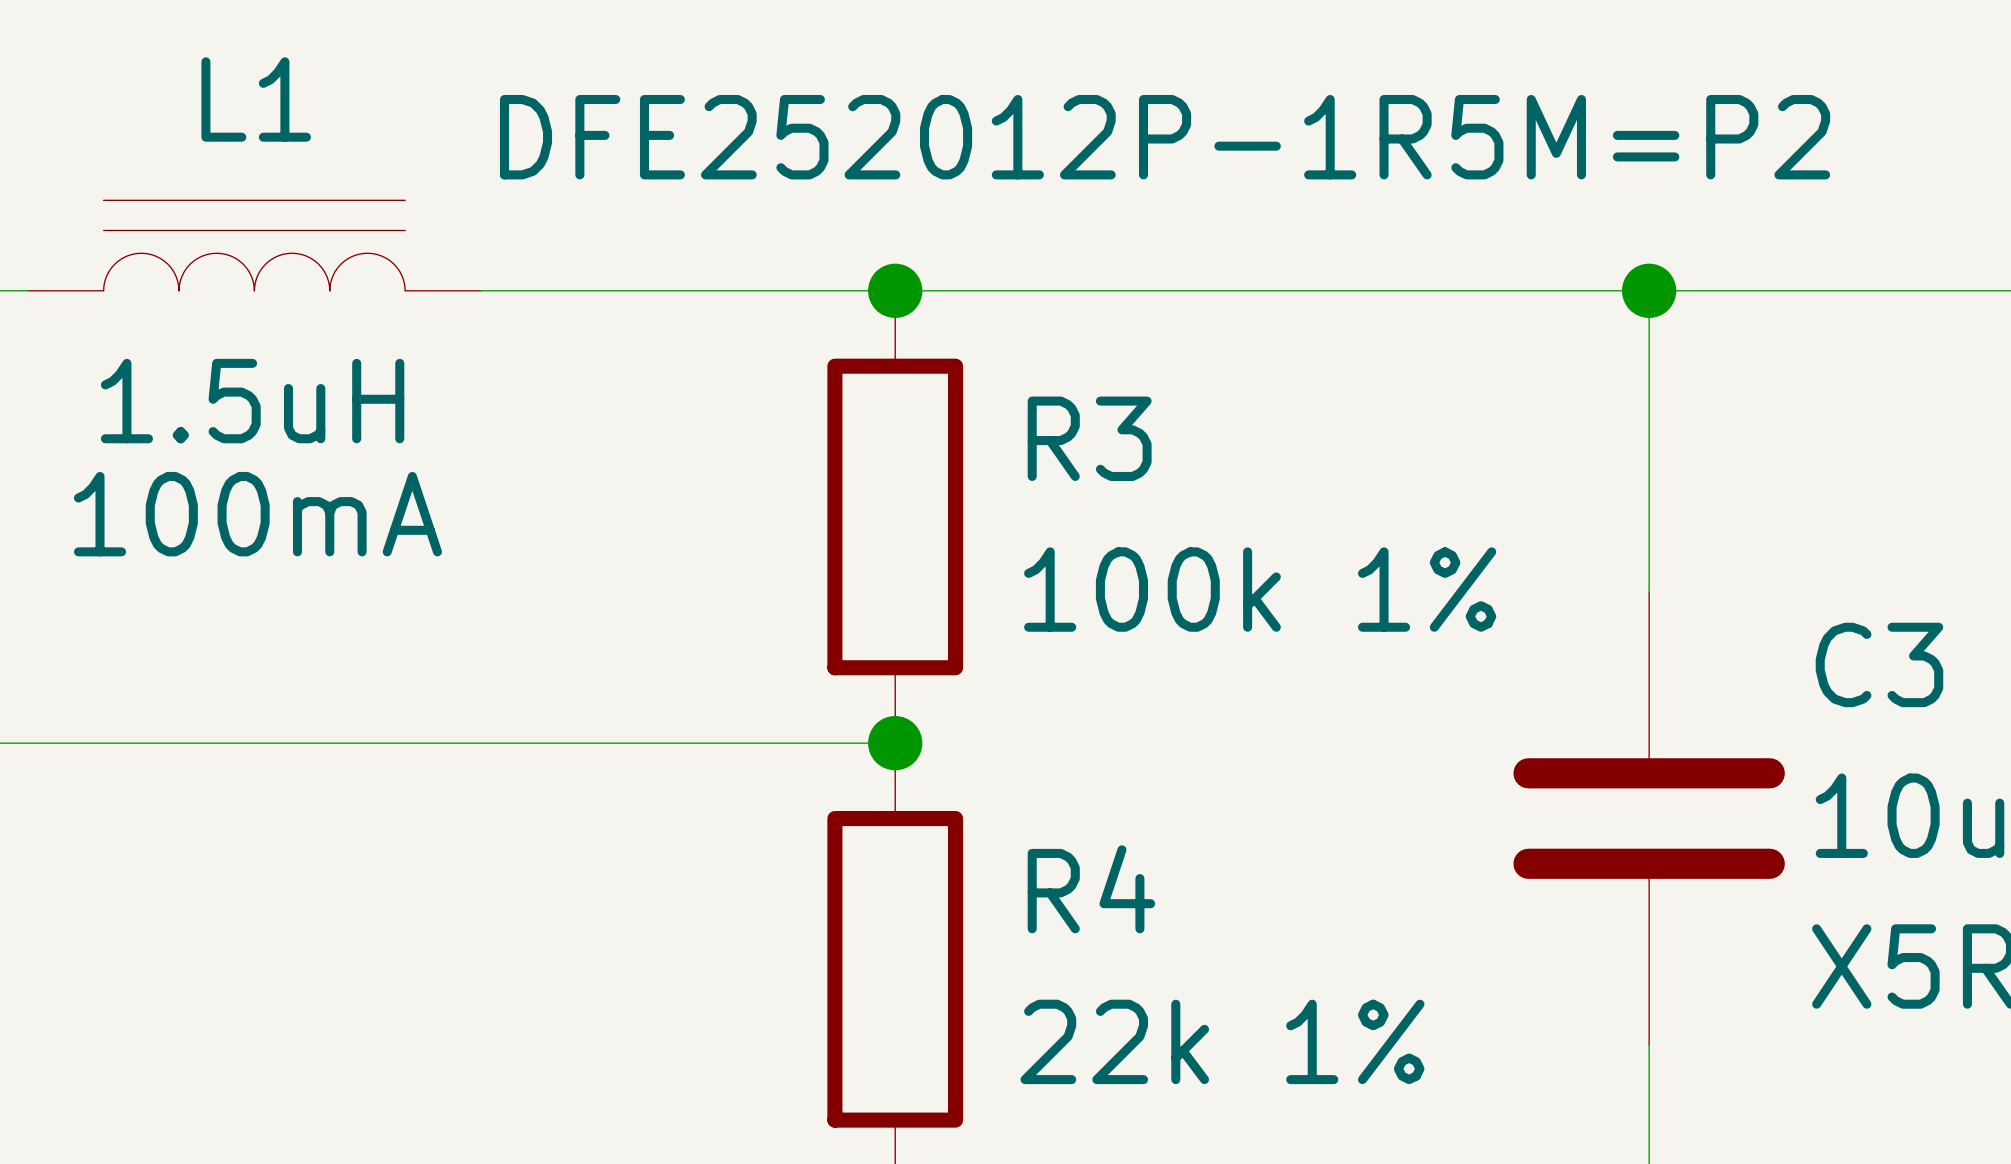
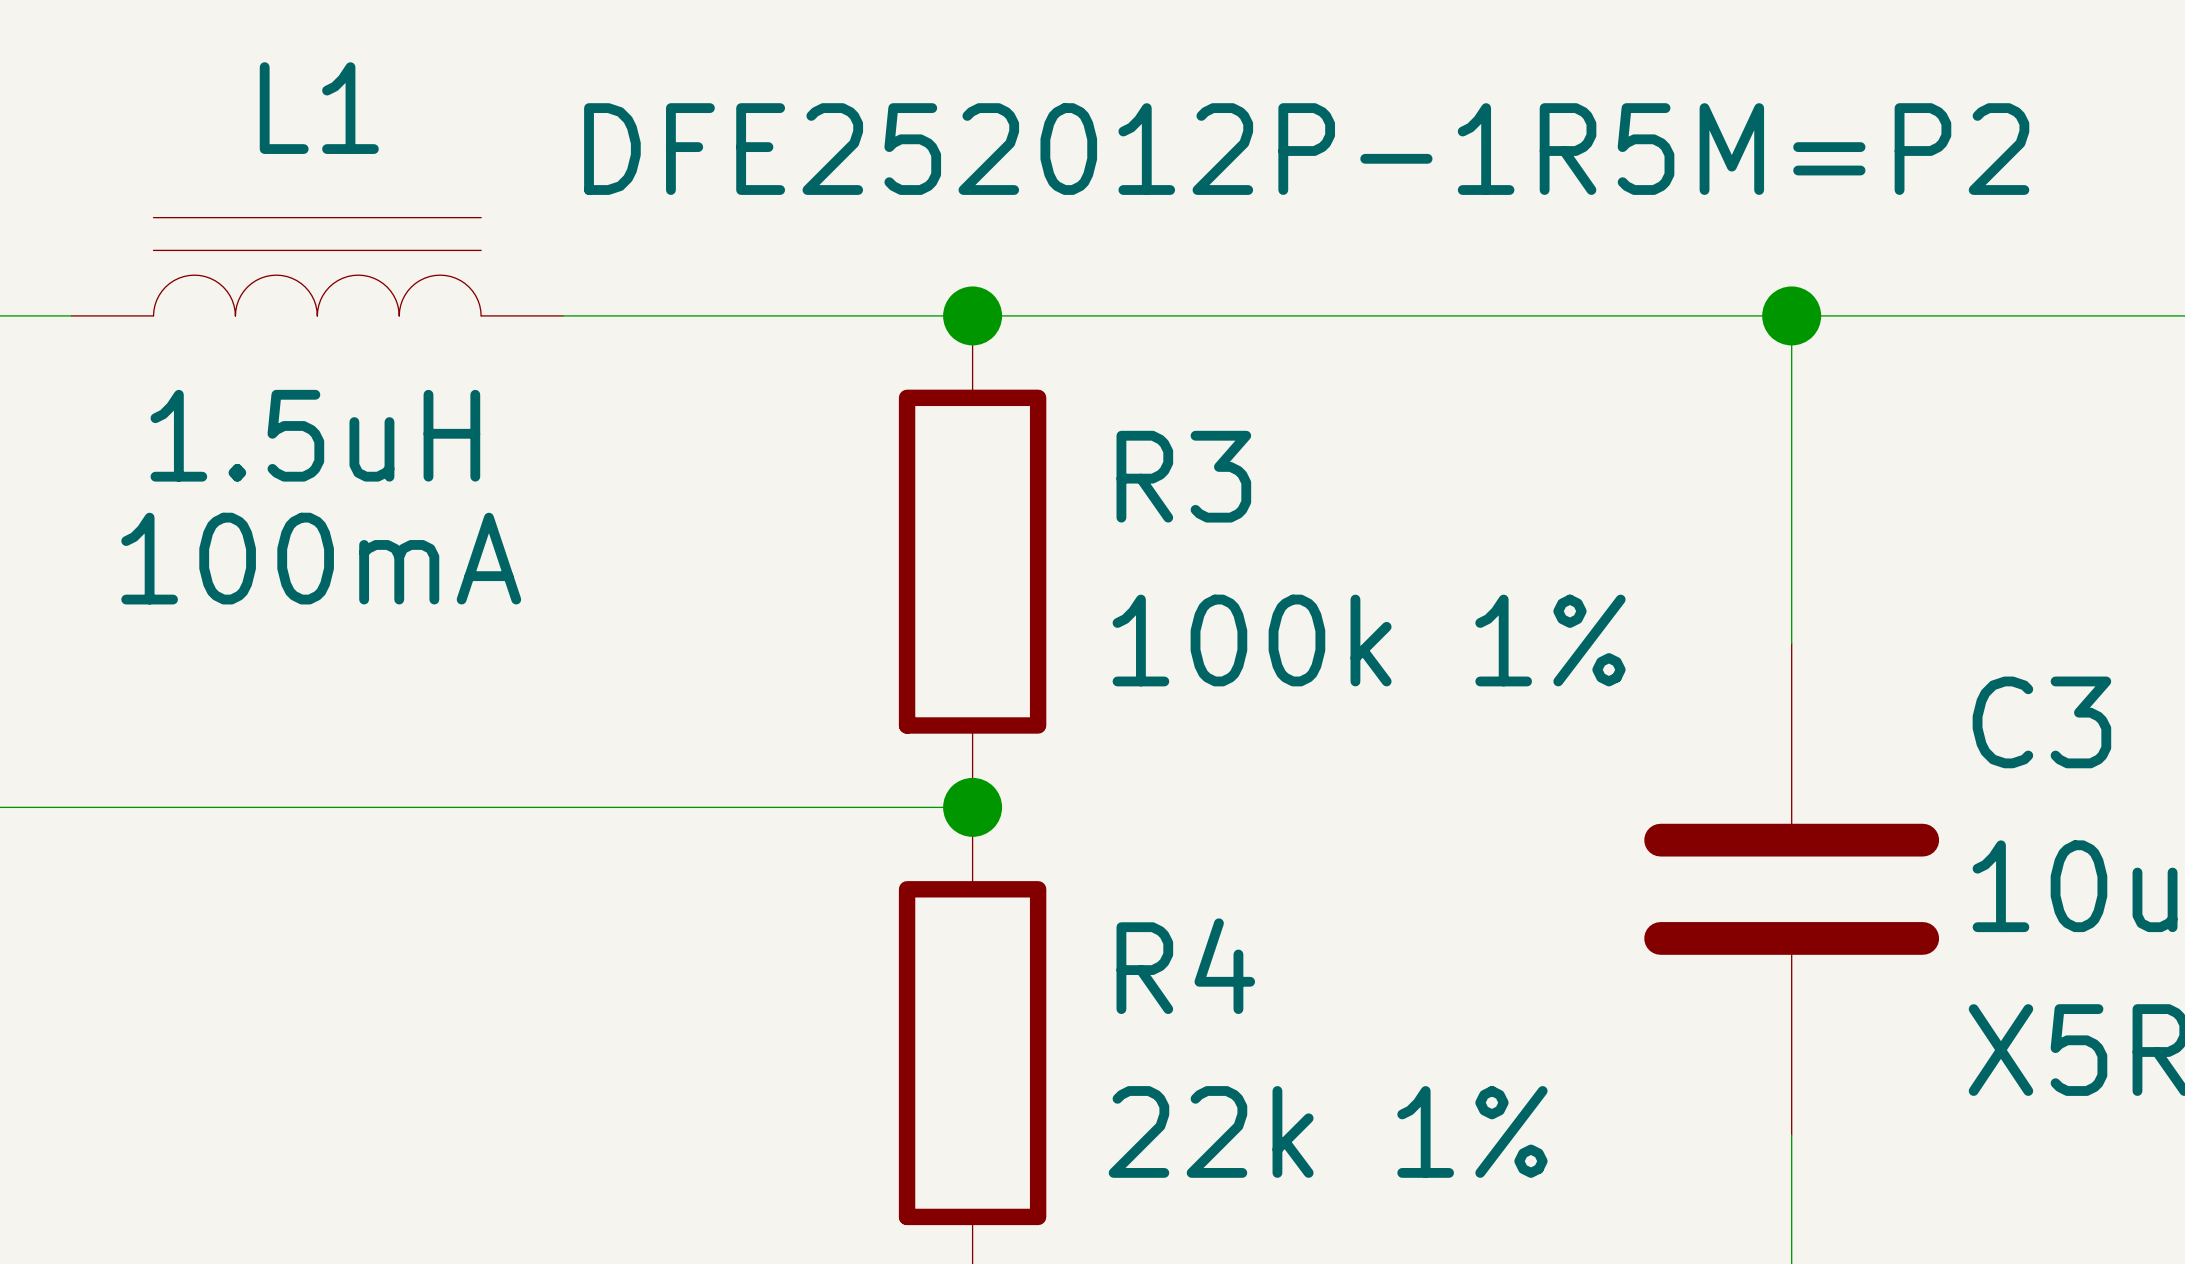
L1 position: (254, 245) -> (317, 266)

